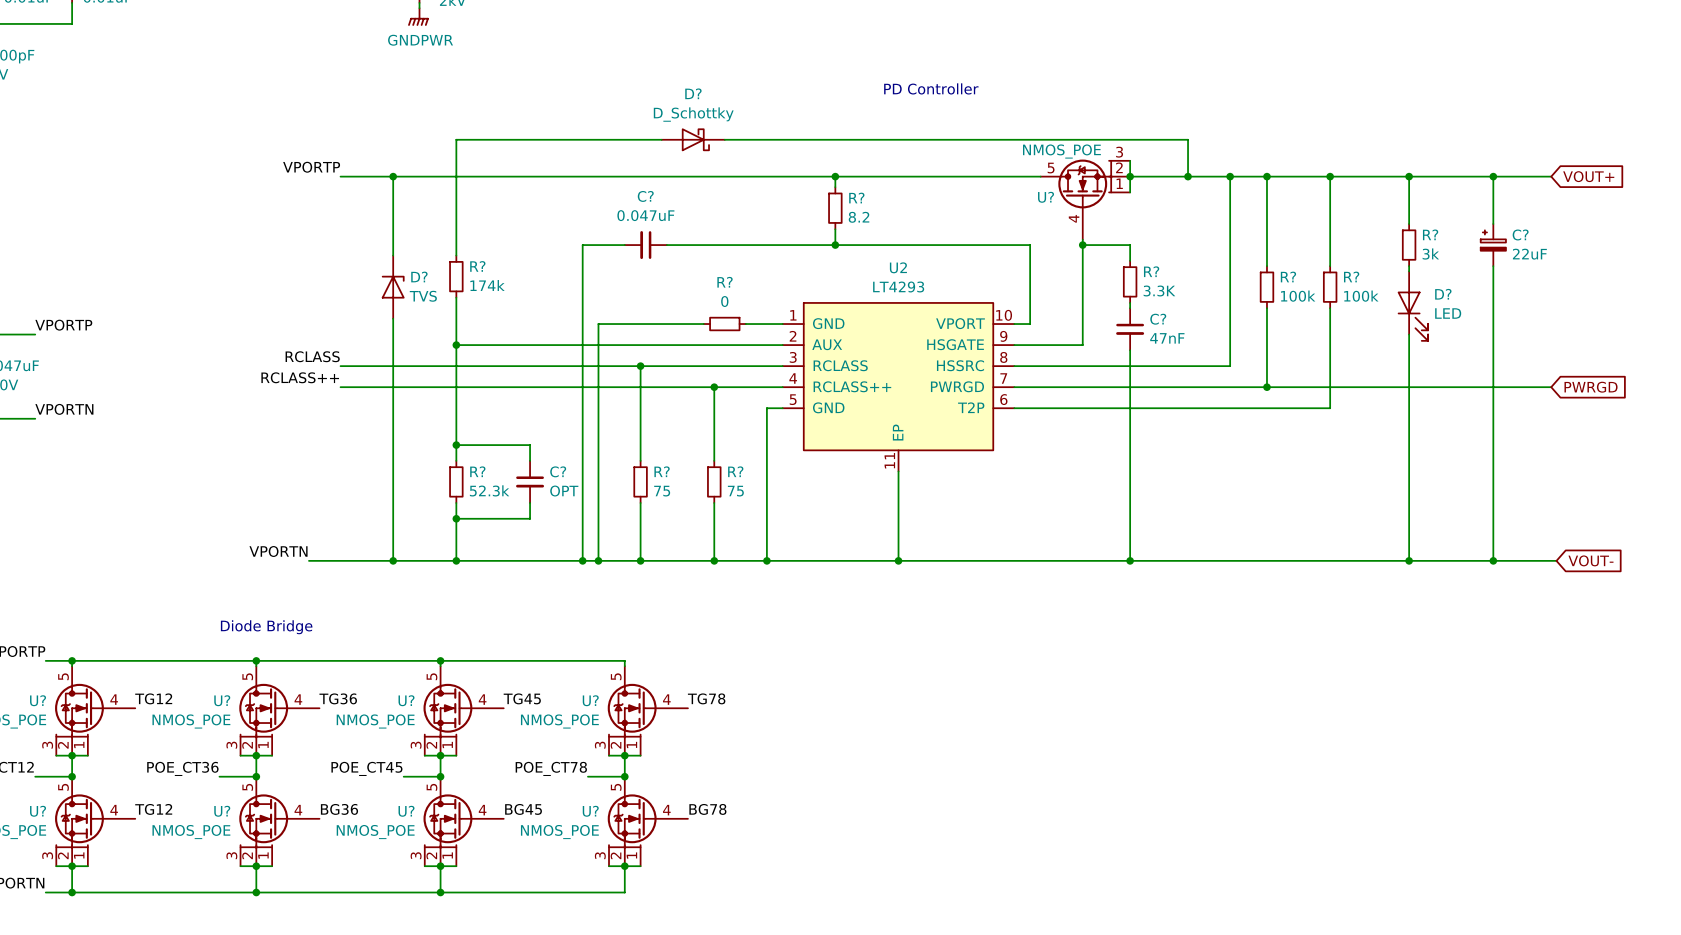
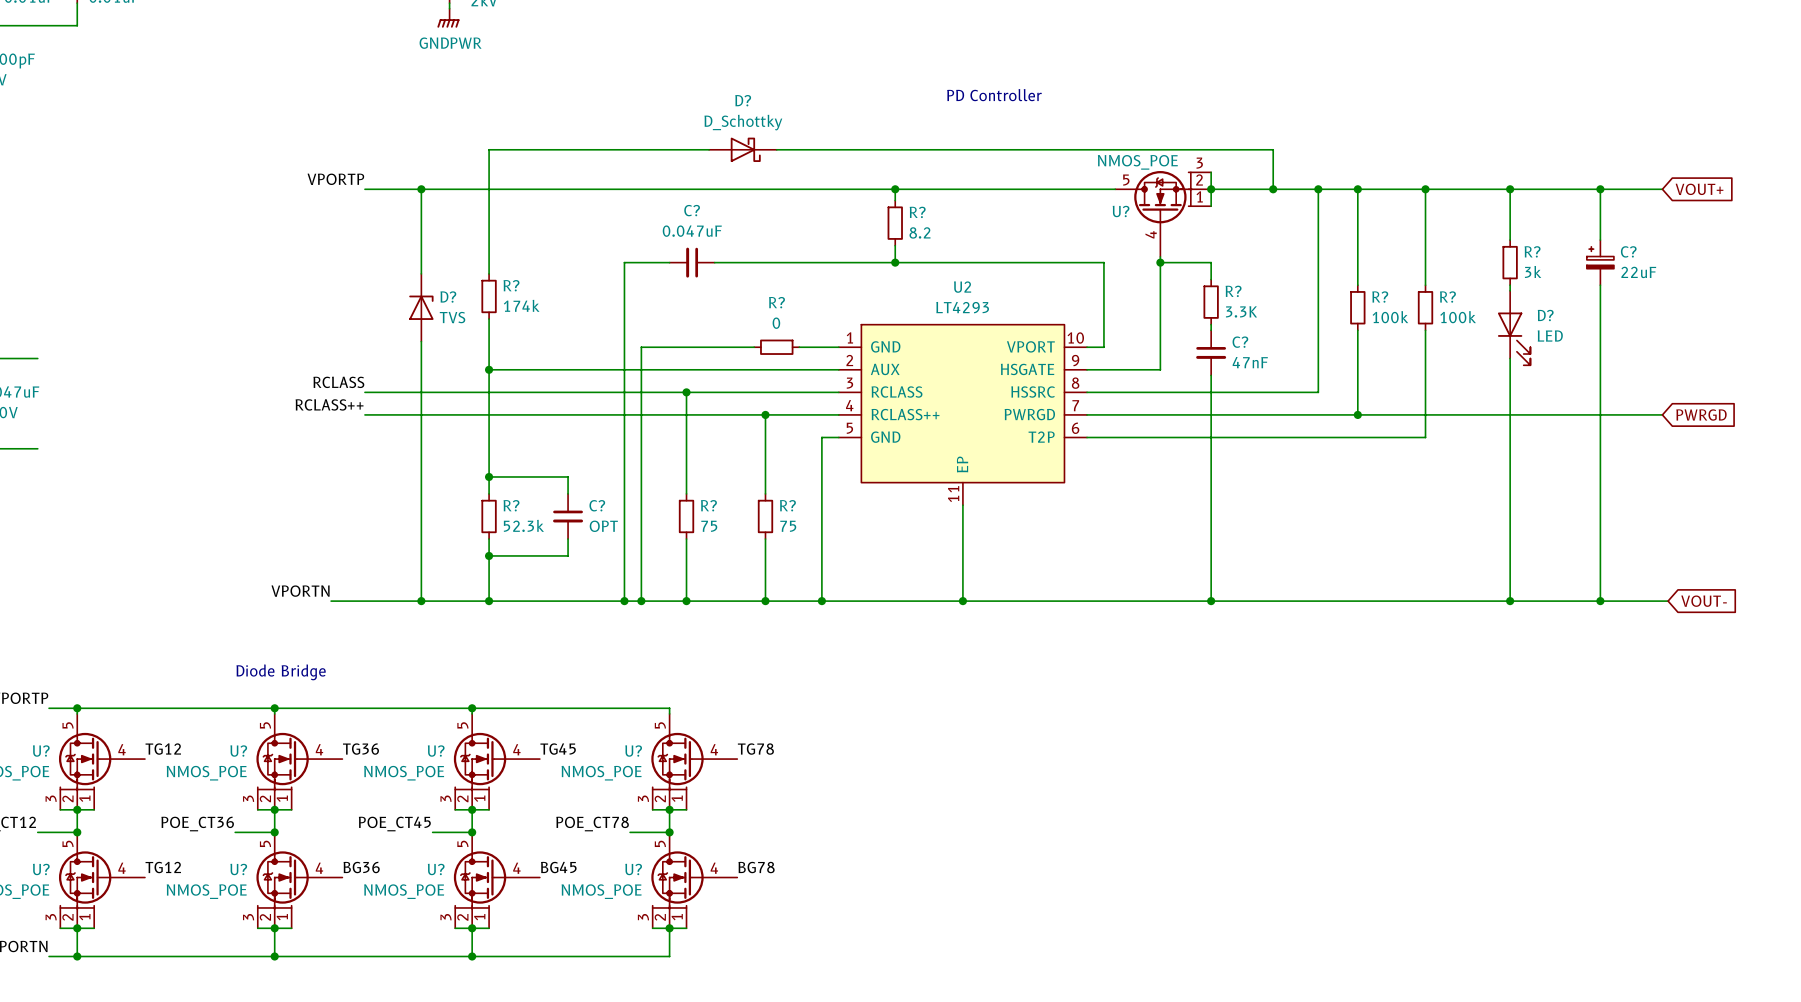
label: VPORTP (63, 325) -> none
label: VPORTN (64, 409) -> none

